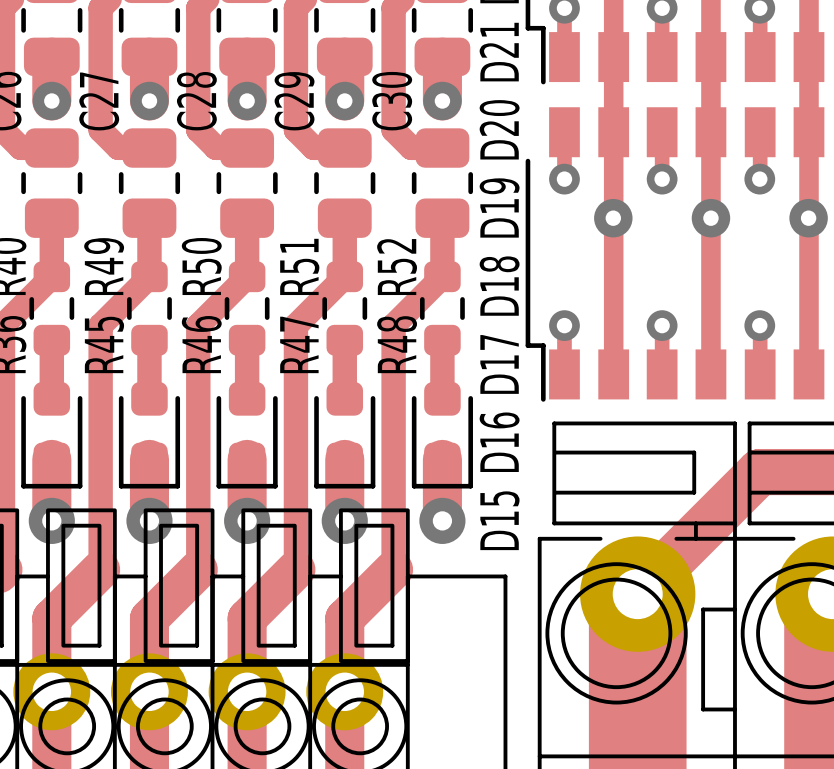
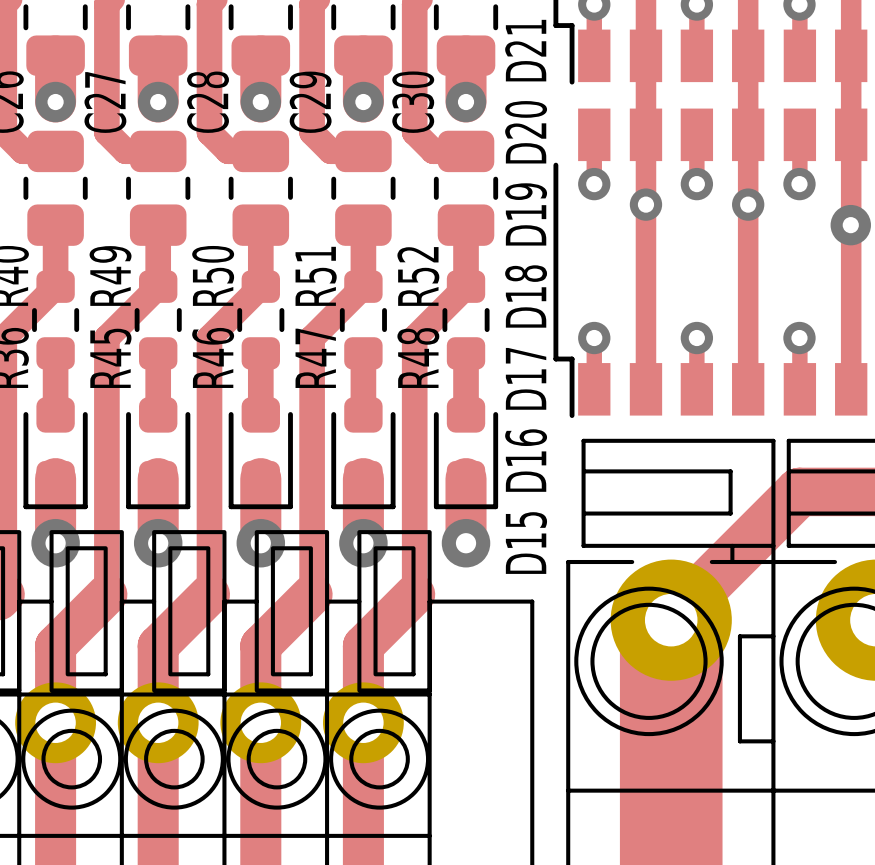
via position: (613, 218) -> (645, 204)
via position: (710, 218) -> (748, 204)

